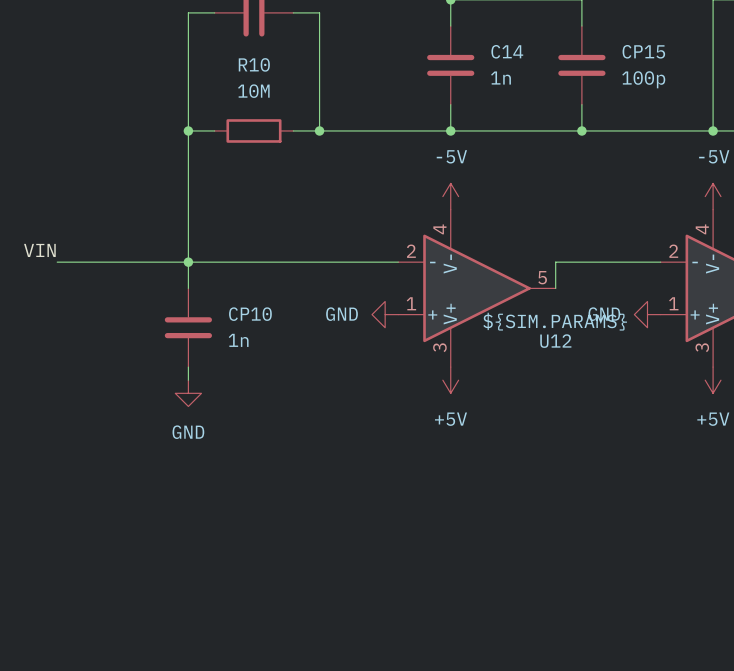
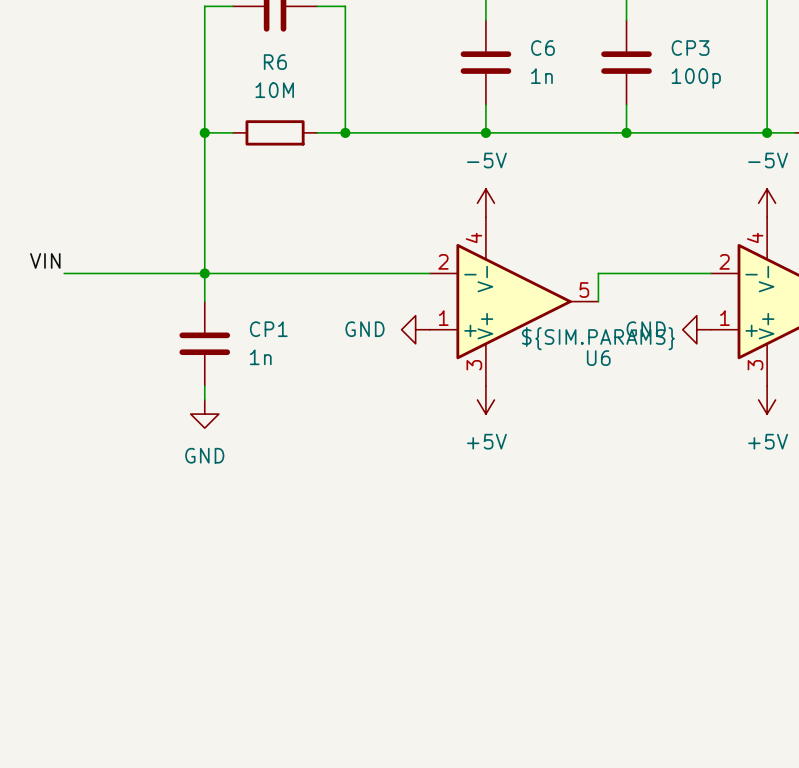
C14 name: C14 (507, 51) -> C6 (542, 48)
CP15 name: CP15 (643, 51) -> CP3 (690, 48)
R10 name: R10 (254, 64) -> R6 (275, 62)
CP10 name: CP10 (250, 314) -> CP1 (268, 329)
U12 name: U12 (555, 341) -> U6 (598, 358)

